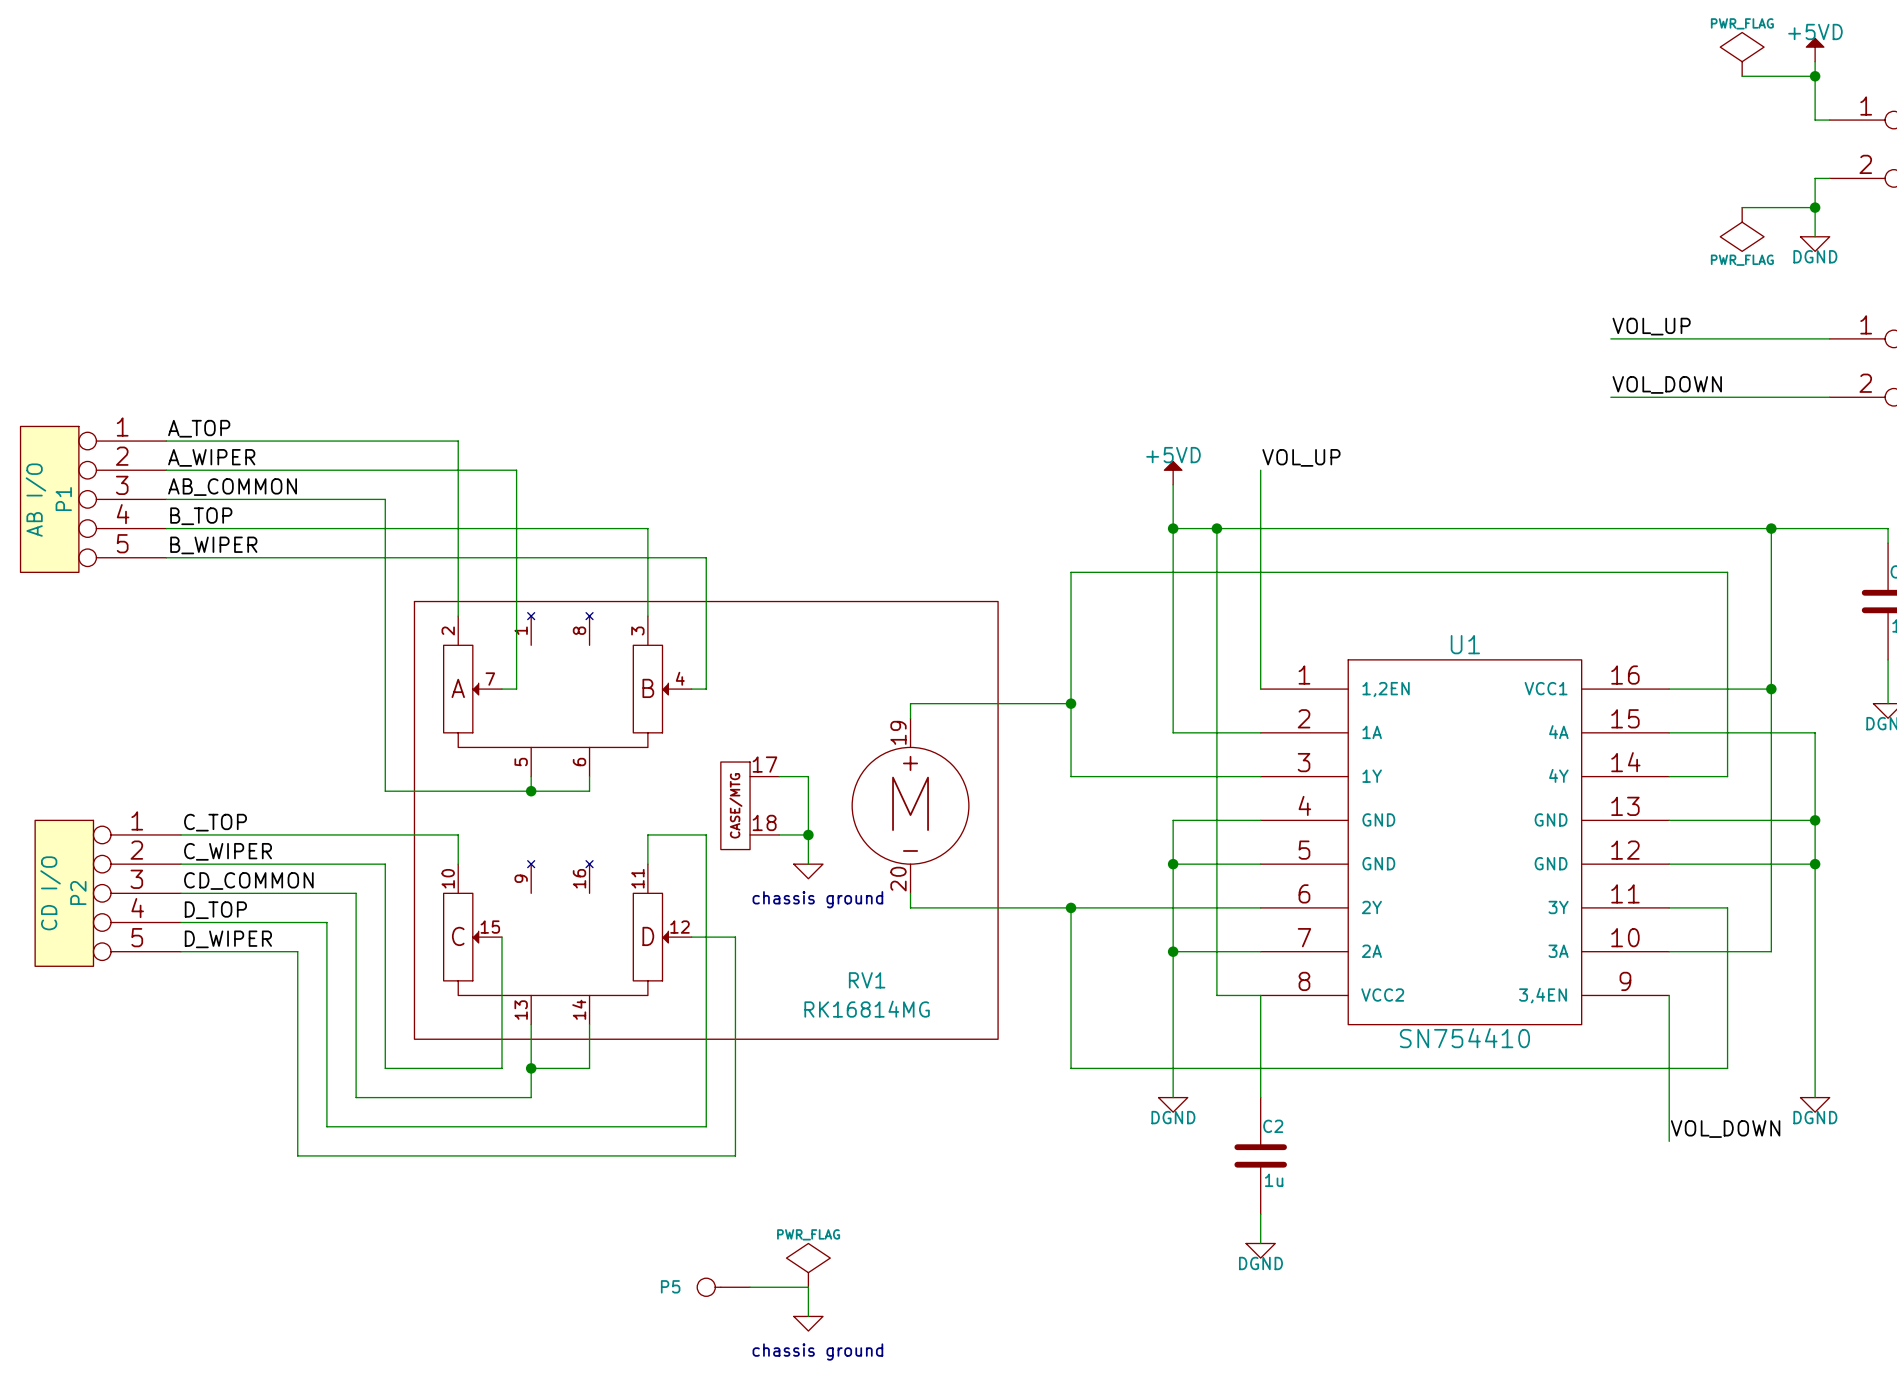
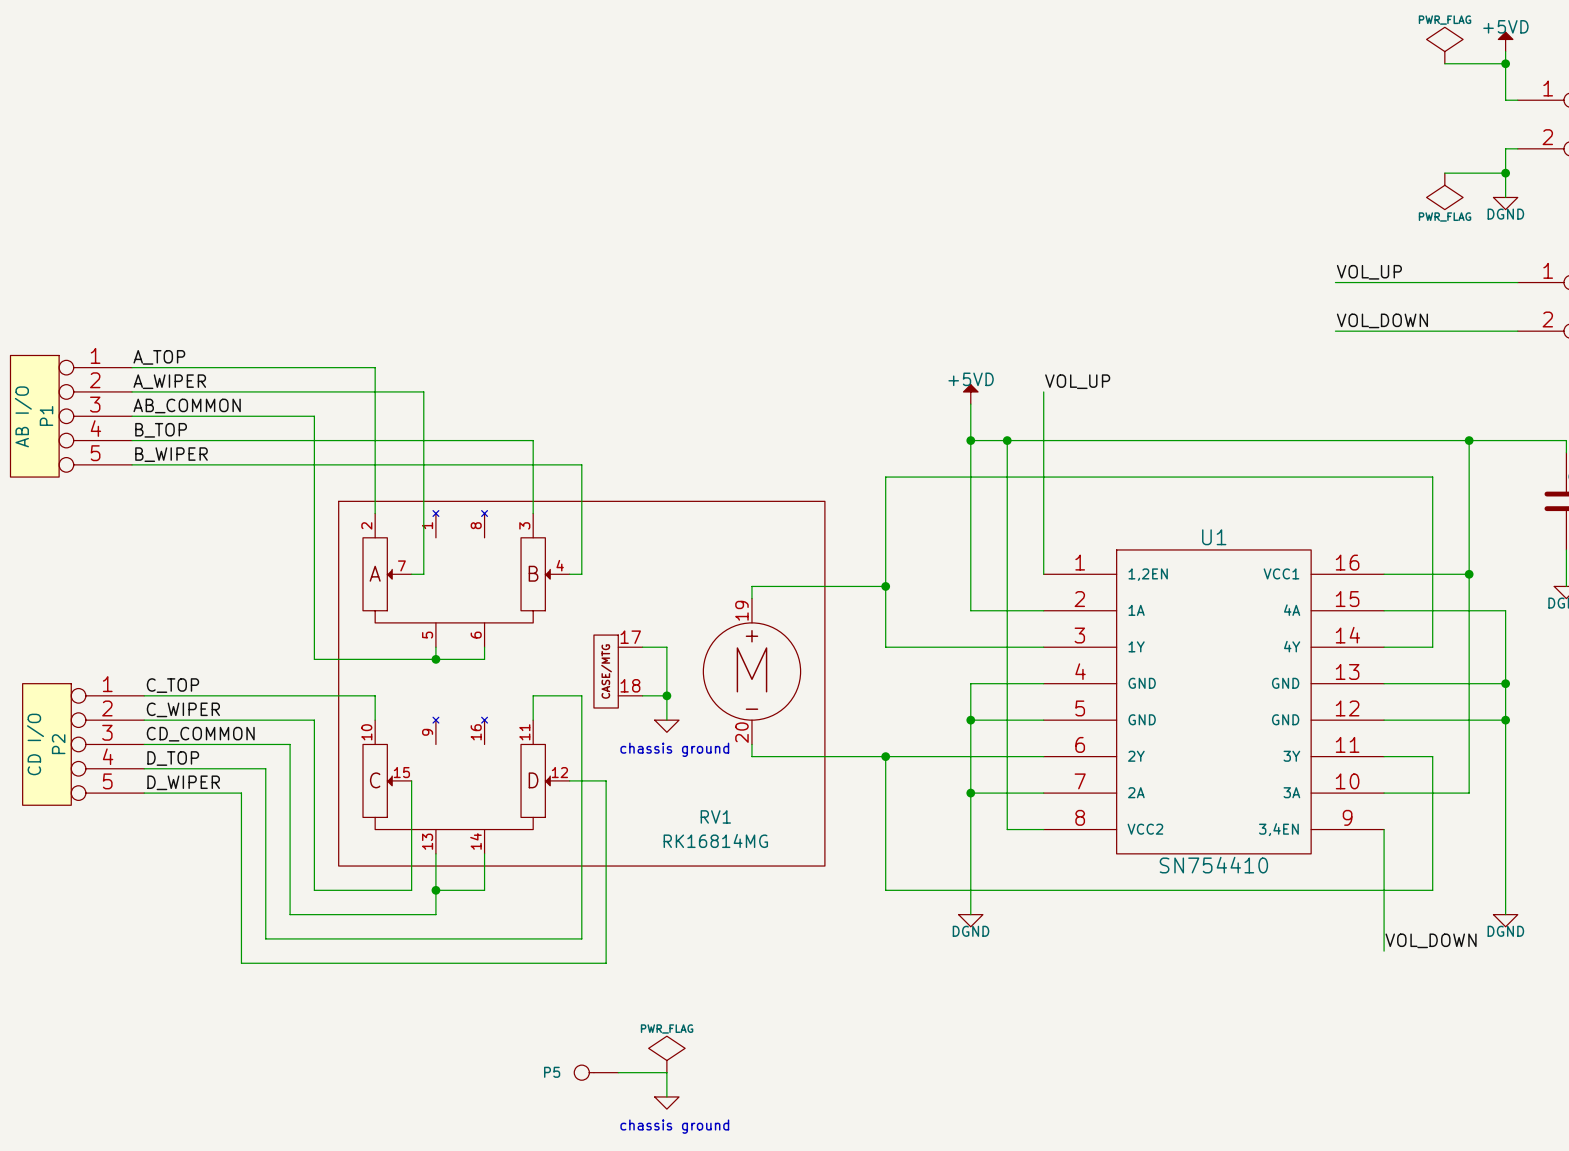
wire: (1260, 995) (1260, 1097) -> none
C2: 1u (1260, 1155) -> none
wire: (1260, 1214) (1260, 1243) -> none
power symbol: DGND (1260, 1250) -> none

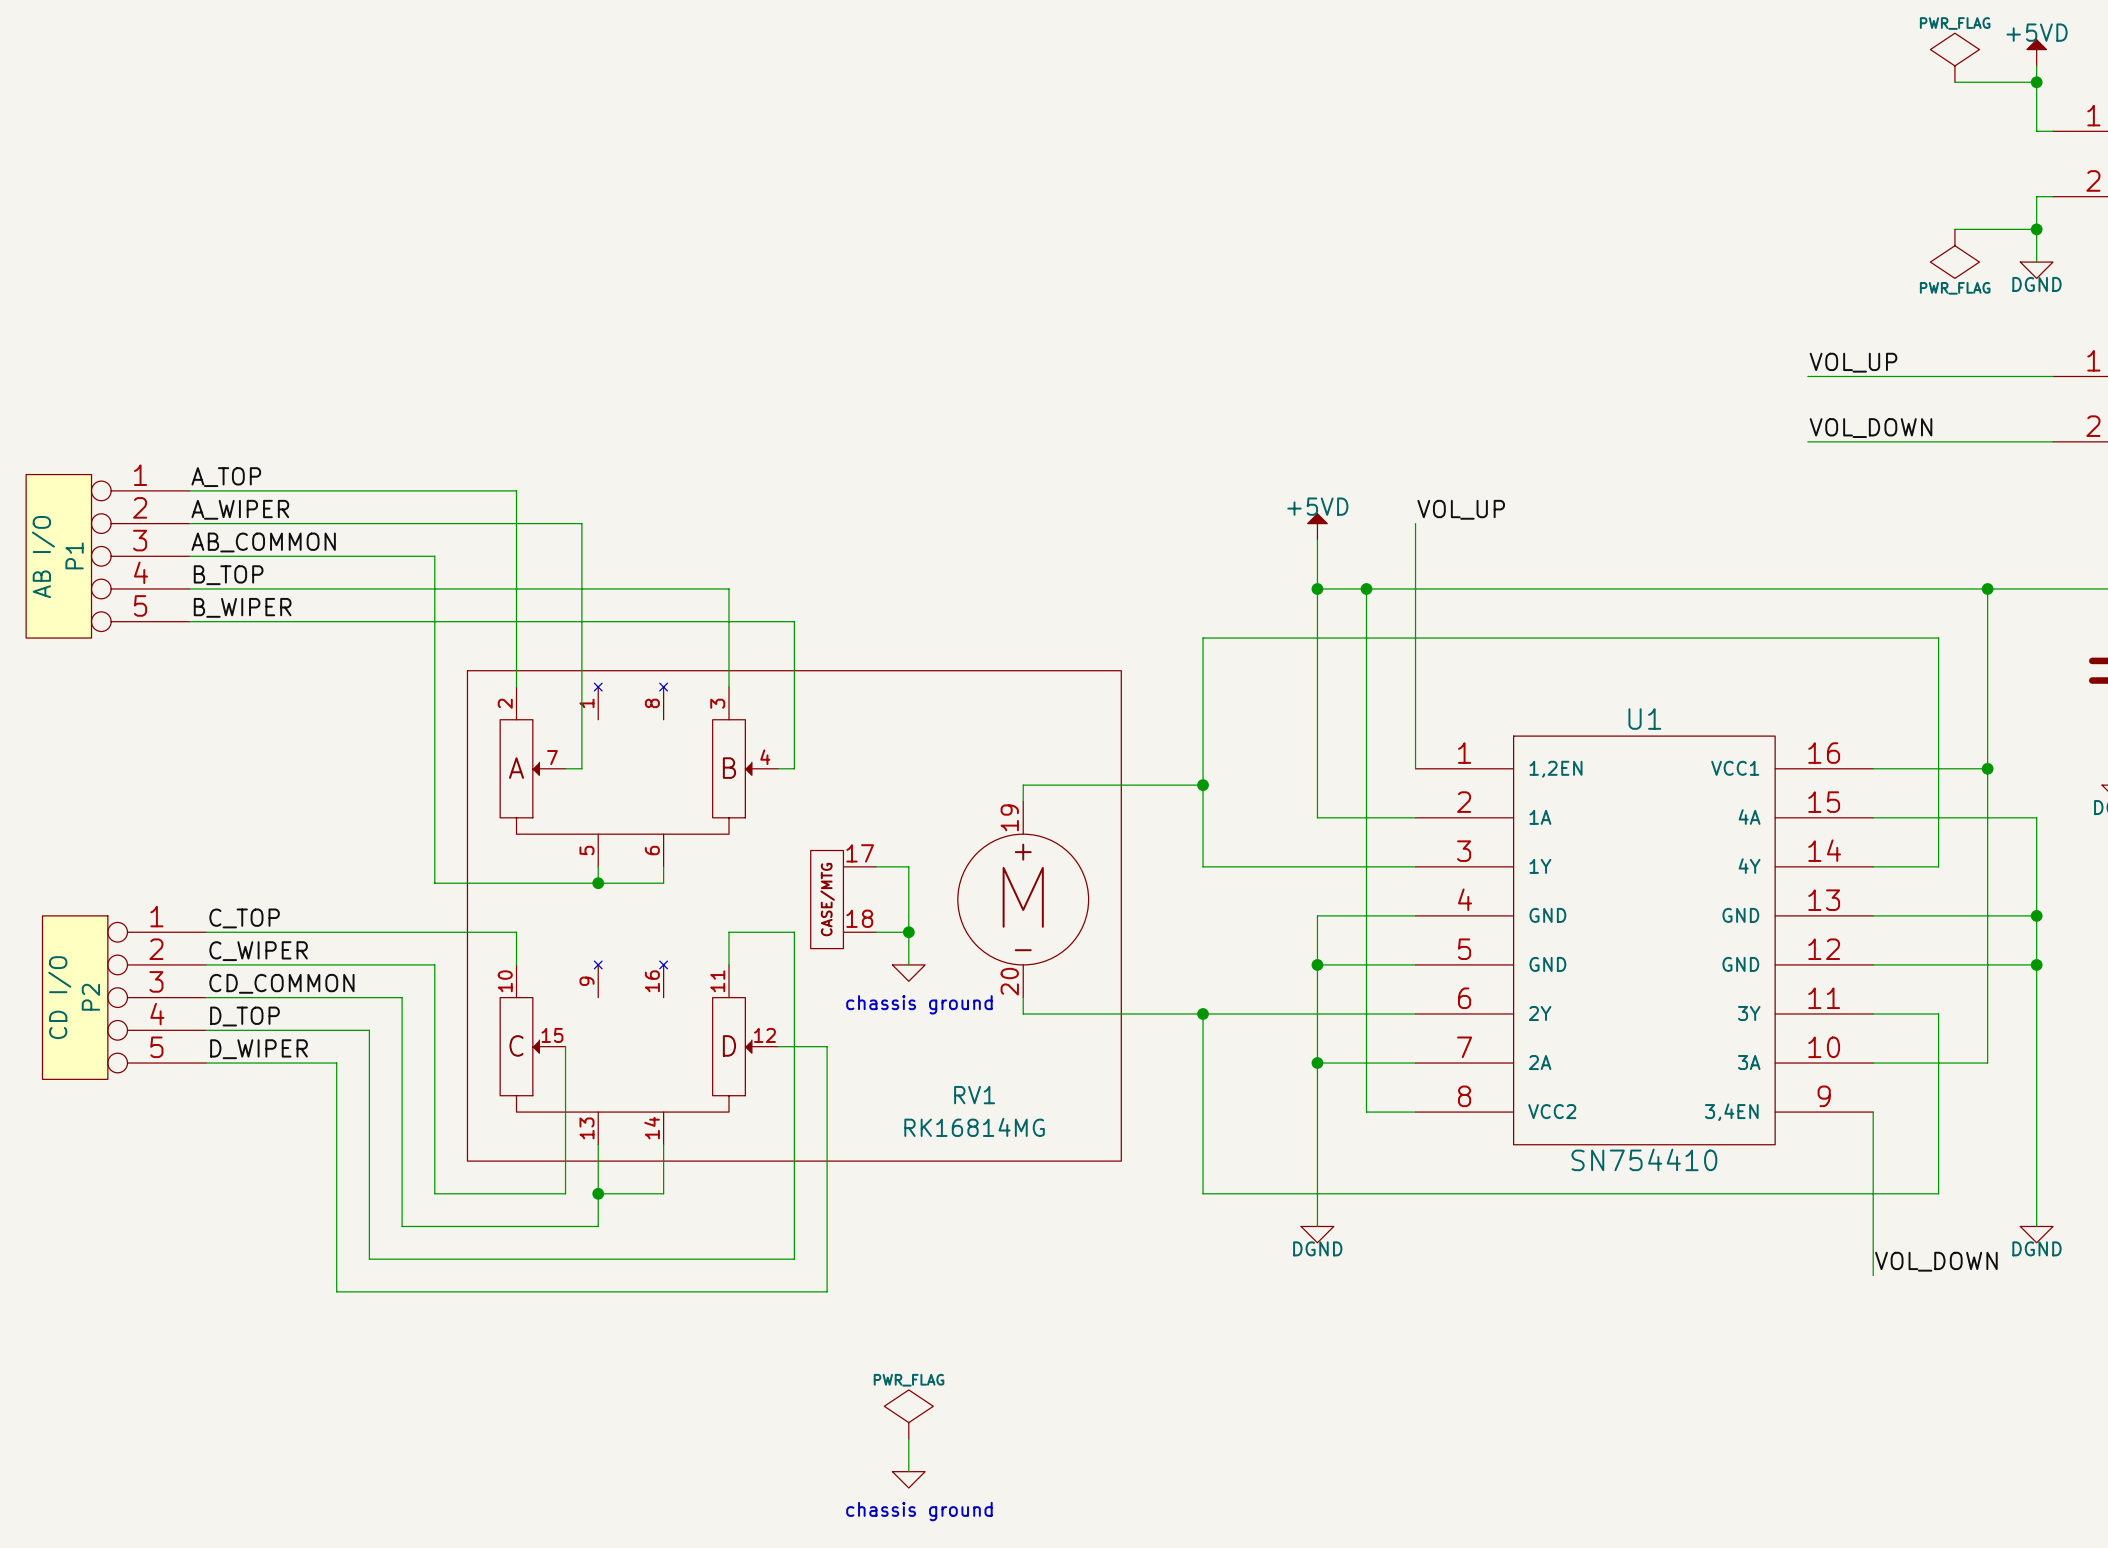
P5: (596, 1072) -> none
wire: (618, 1072) (666, 1072) -> none

